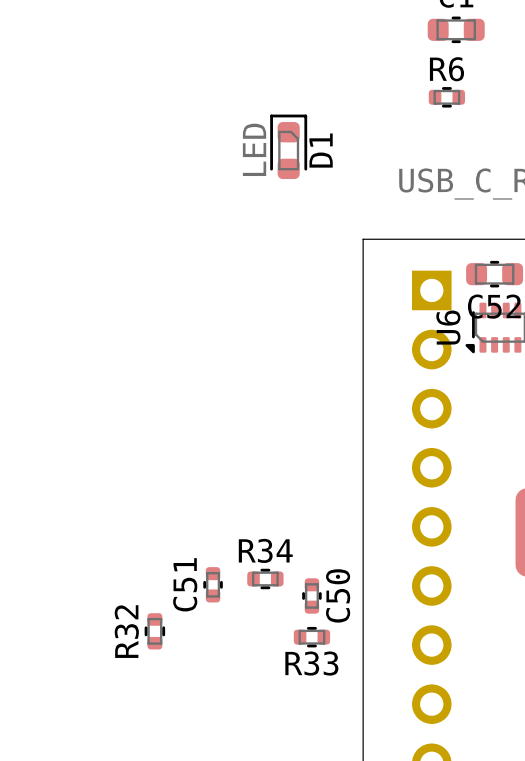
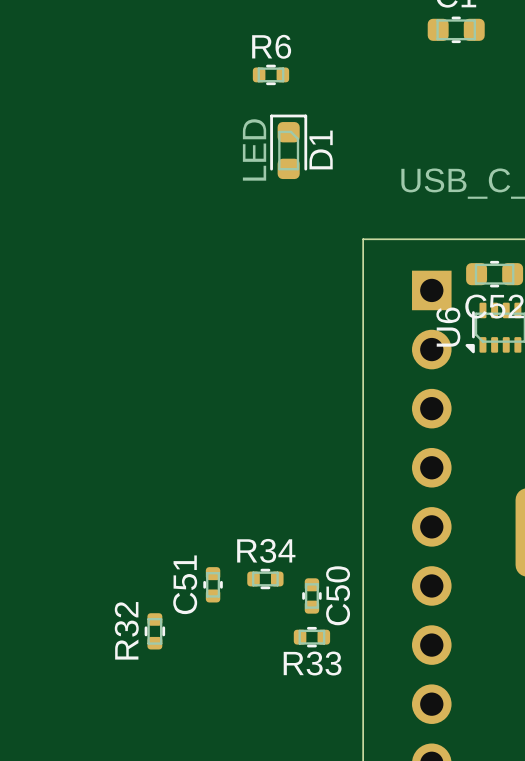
R6 position: (446, 97) -> (270, 74)

